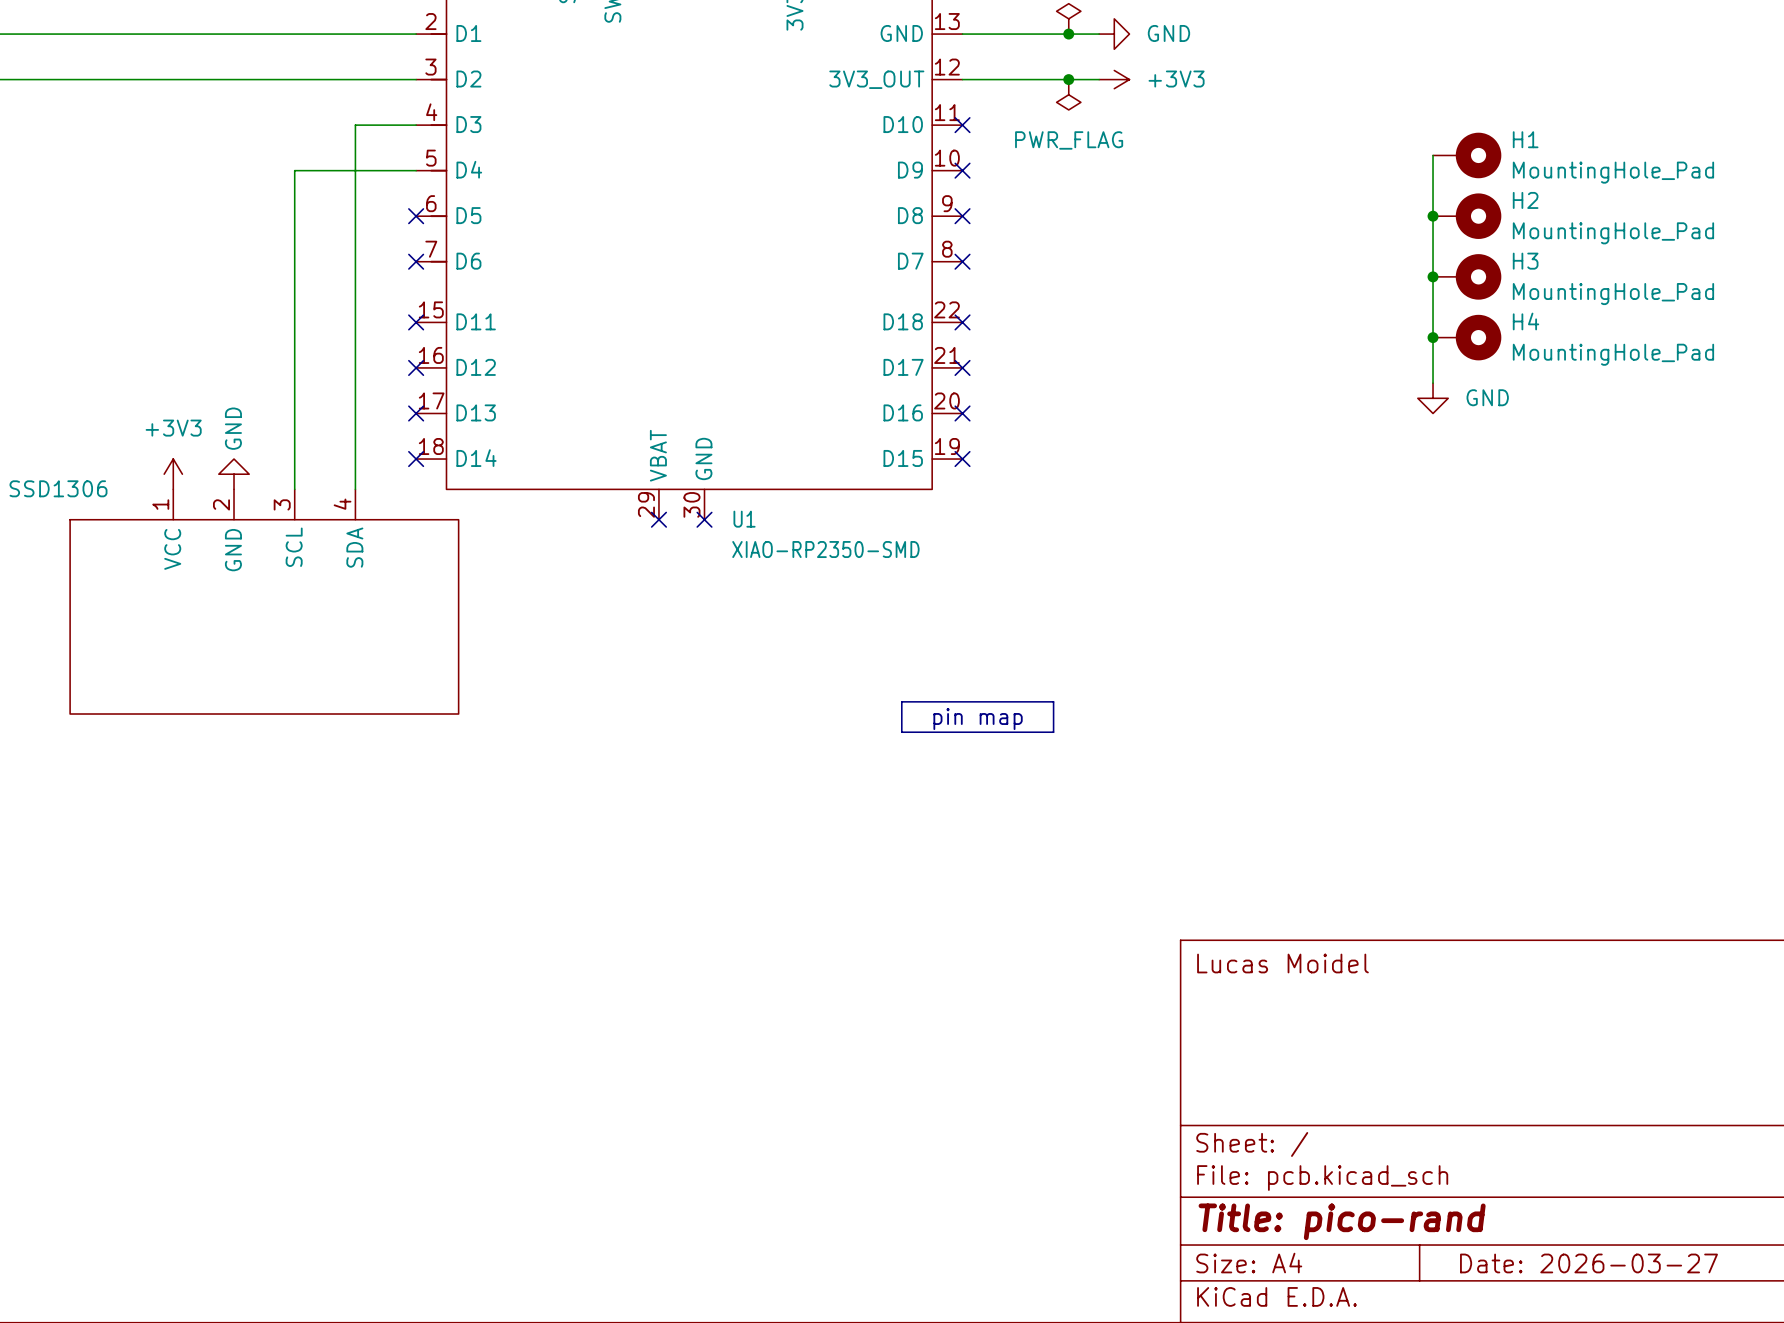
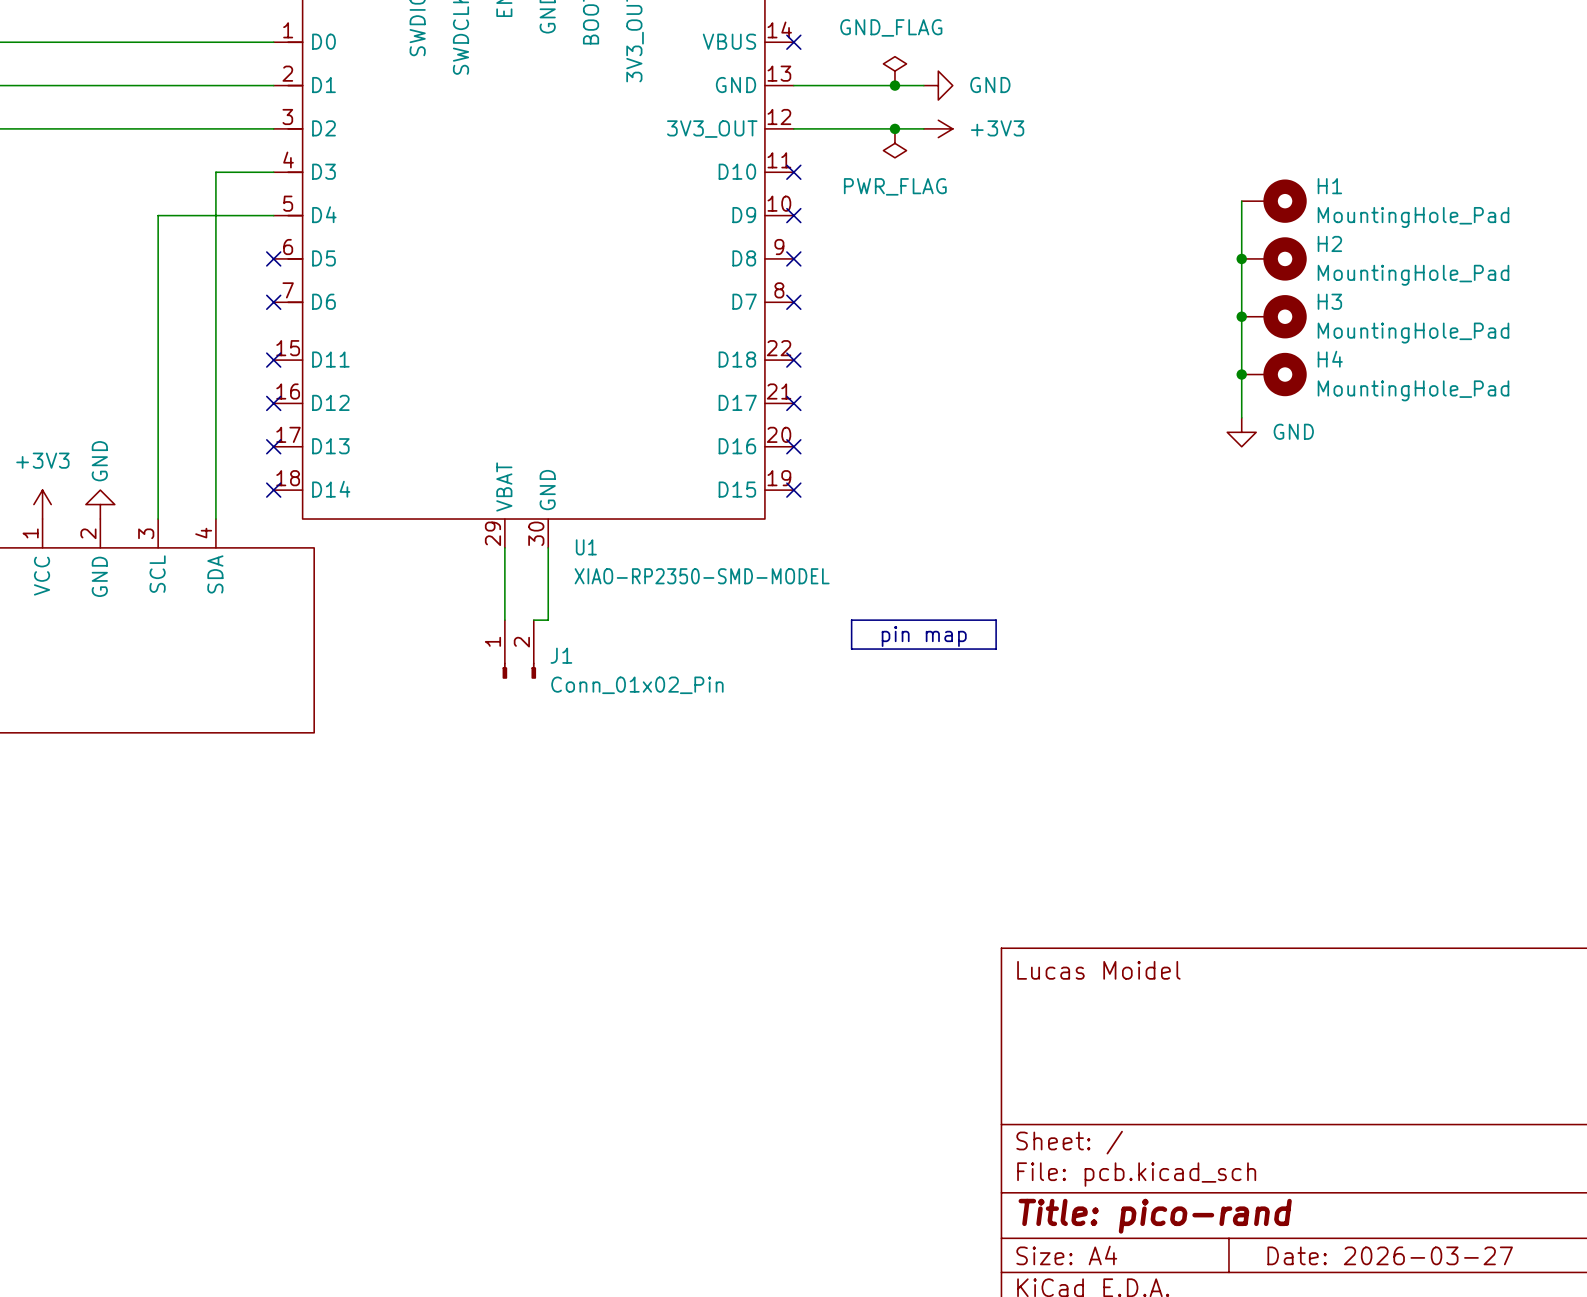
wire: none -> (504, 547) (504, 620)
no-connect mark: (658, 519) -> none
wire: none -> (548, 547) (548, 620) (533, 620)
no-connect mark: (704, 519) -> none
U1 value: XIAO-RP2350-SMD (825, 549) -> XIAO-RP2350-SMD-MODEL (702, 576)
J1: none -> Conn_01x02_Pin (519, 649)
line: (901, 701) (1053, 701) (1053, 732) (901, 732) (901, 701) -> (851, 620) (996, 620) (996, 649) (851, 649) (851, 620)
text position: pin map (978, 718) -> pin map (924, 636)

